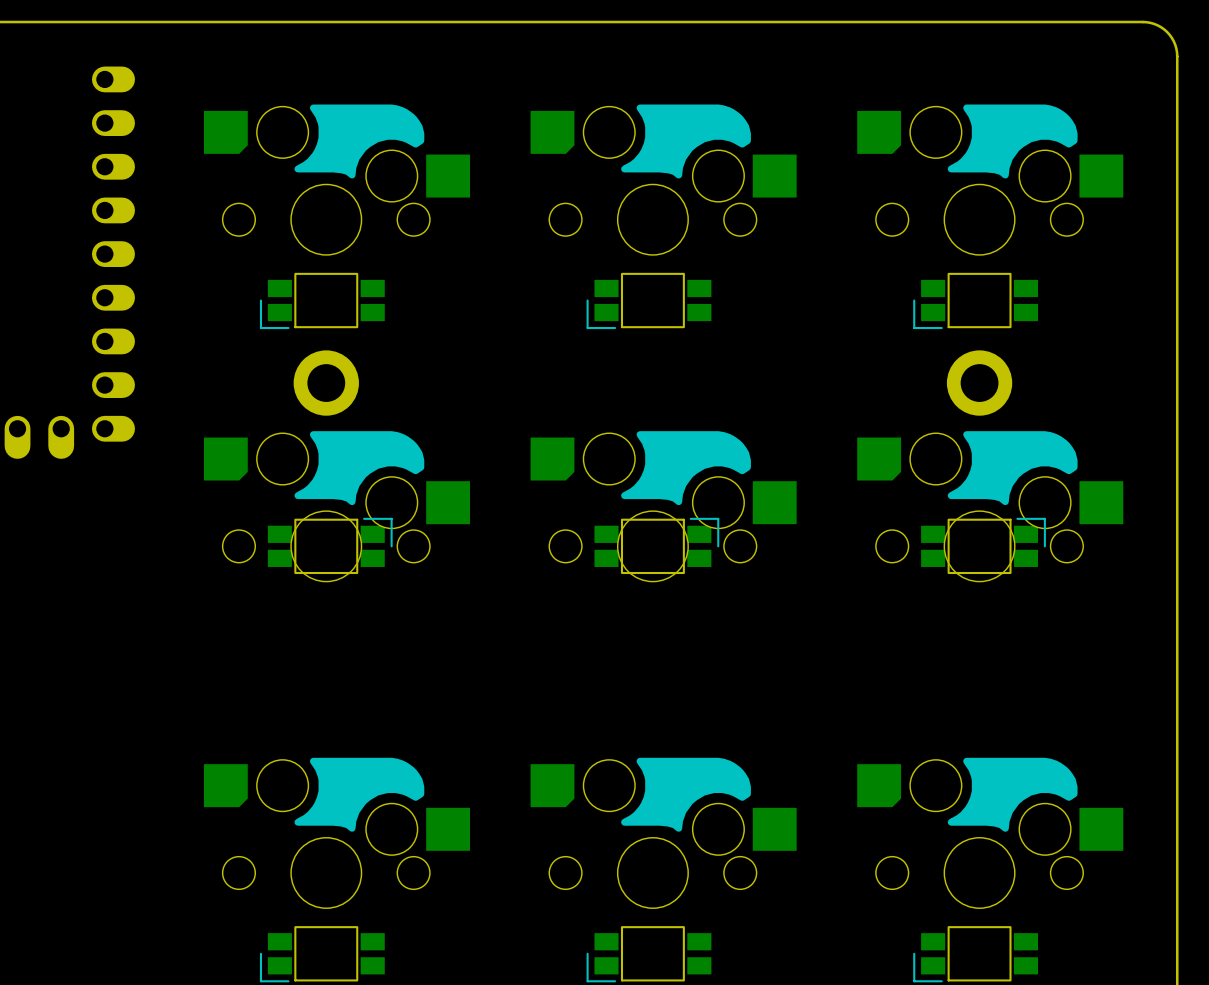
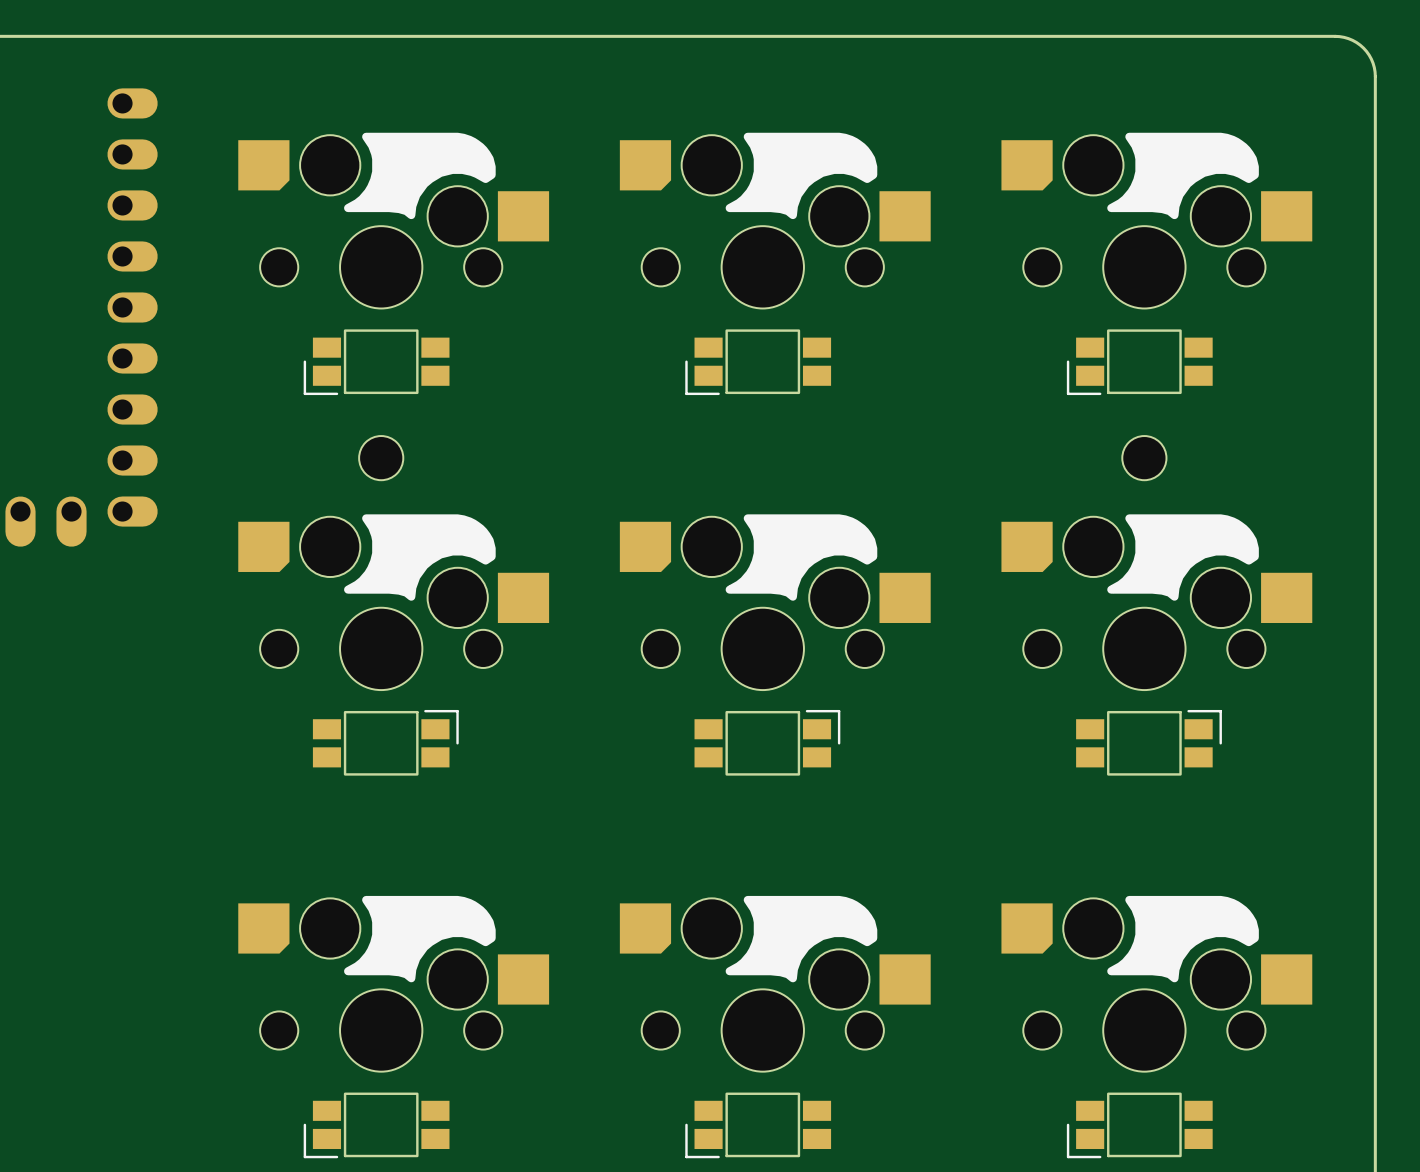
part footprint: [293, 350, 359, 416] -> [359, 436, 404, 481]
part footprint: [946, 350, 1013, 416] -> [1122, 436, 1167, 481]
part position: (330, 545) -> (385, 742)
part position: (656, 545) -> (767, 742)
part position: (983, 545) -> (1149, 742)

